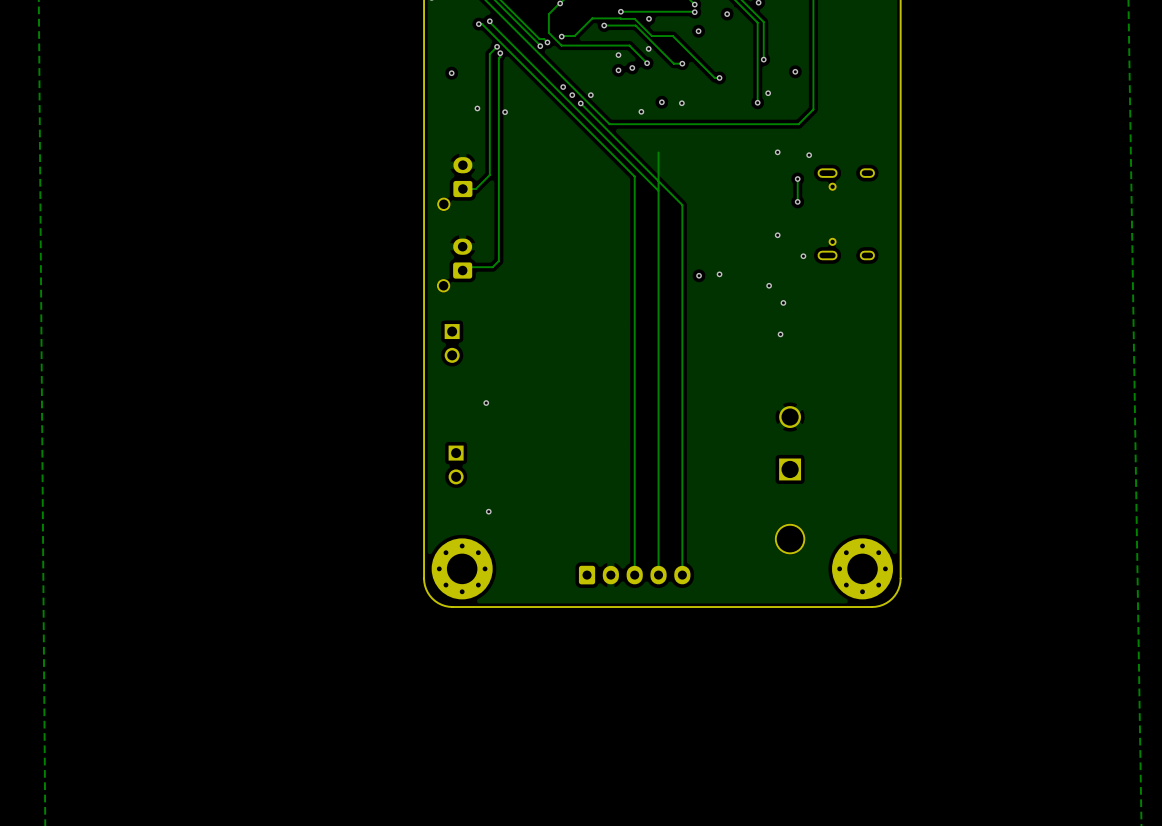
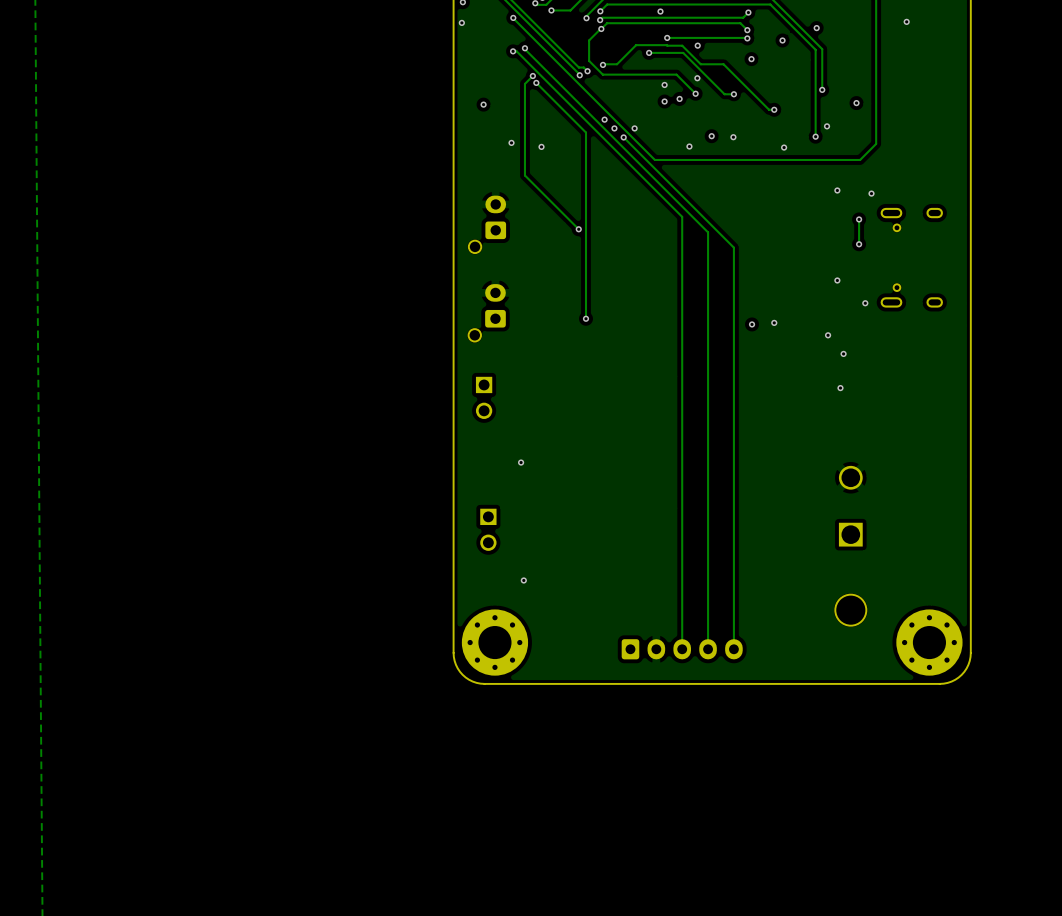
track: (500, 53) (498, 260) (492, 267) (465, 267) -> (536, 82) (585, 132) (585, 318)
via: none -> (784, 147)
track: (489, 138) (489, 175) (475, 189) (462, 189) -> (524, 175) (578, 229)
track: (658, 152) (658, 190) -> none
via: none -> (578, 229)
via: none -> (585, 318)

